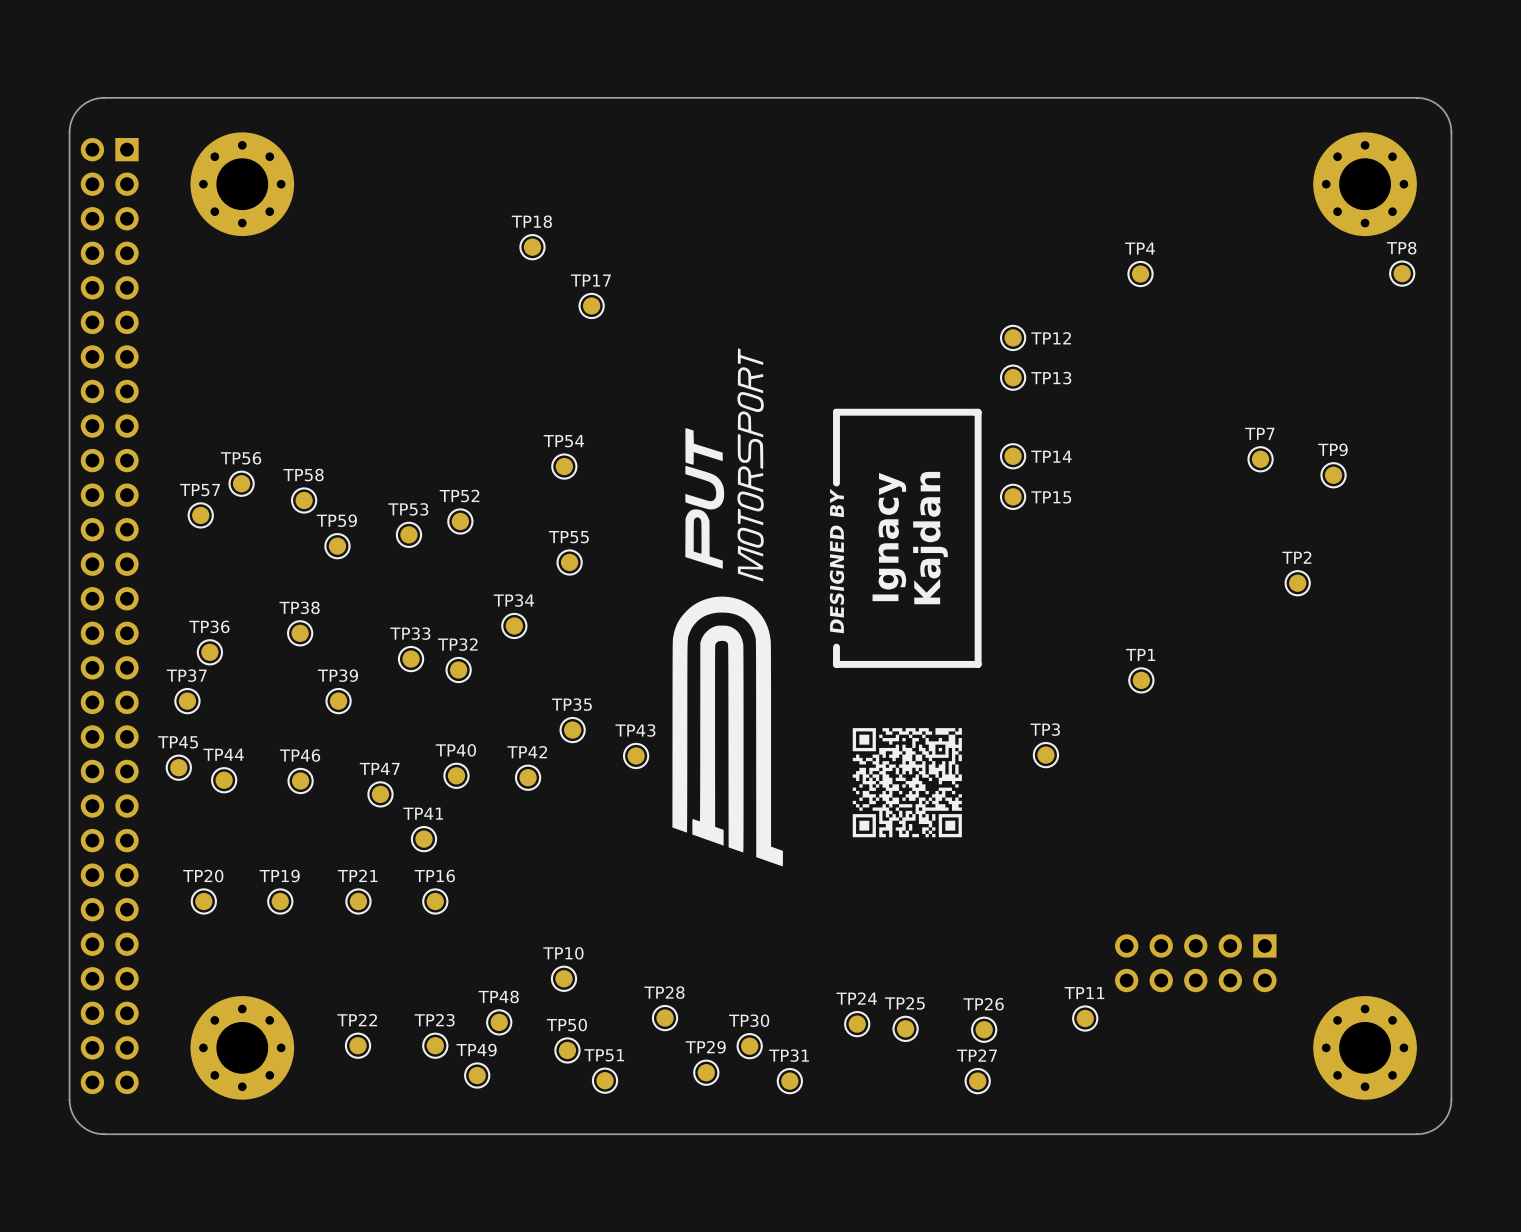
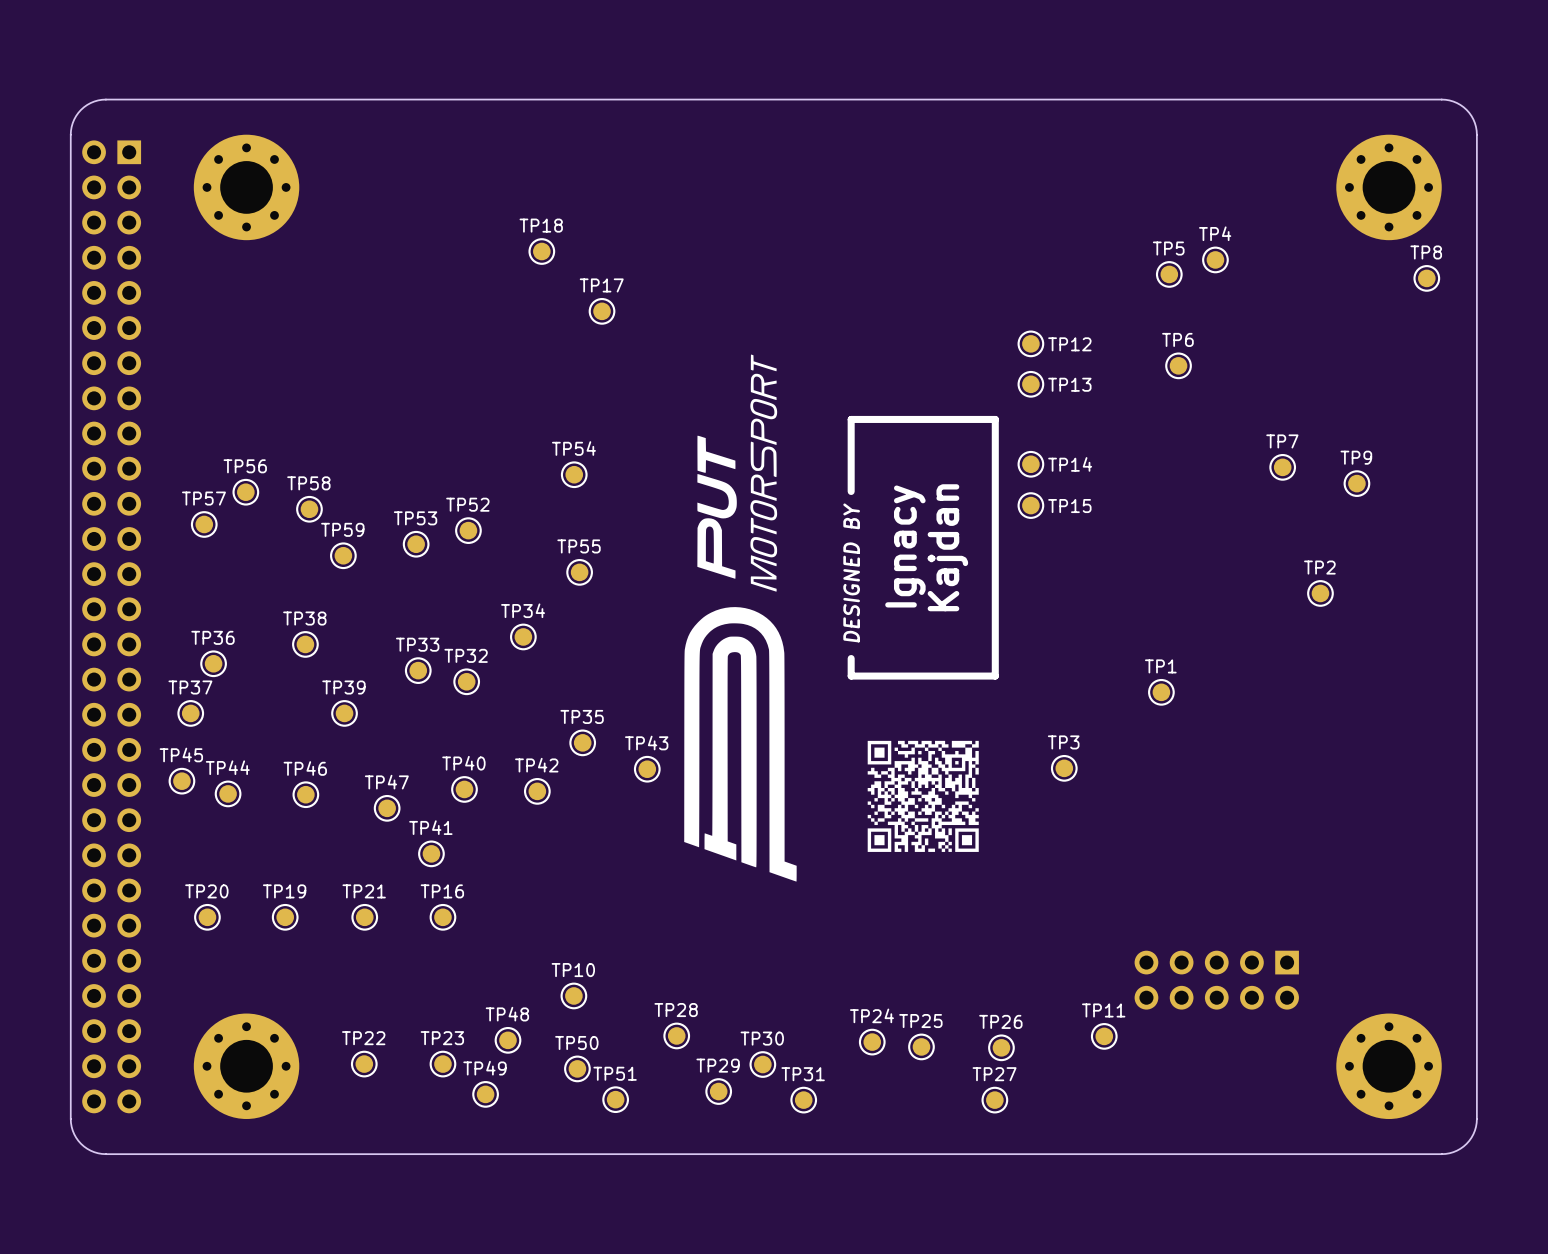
TP5: none -> (1169, 274)
TP4 position: (1140, 274) -> (1215, 259)
TP6: none -> (1178, 365)

